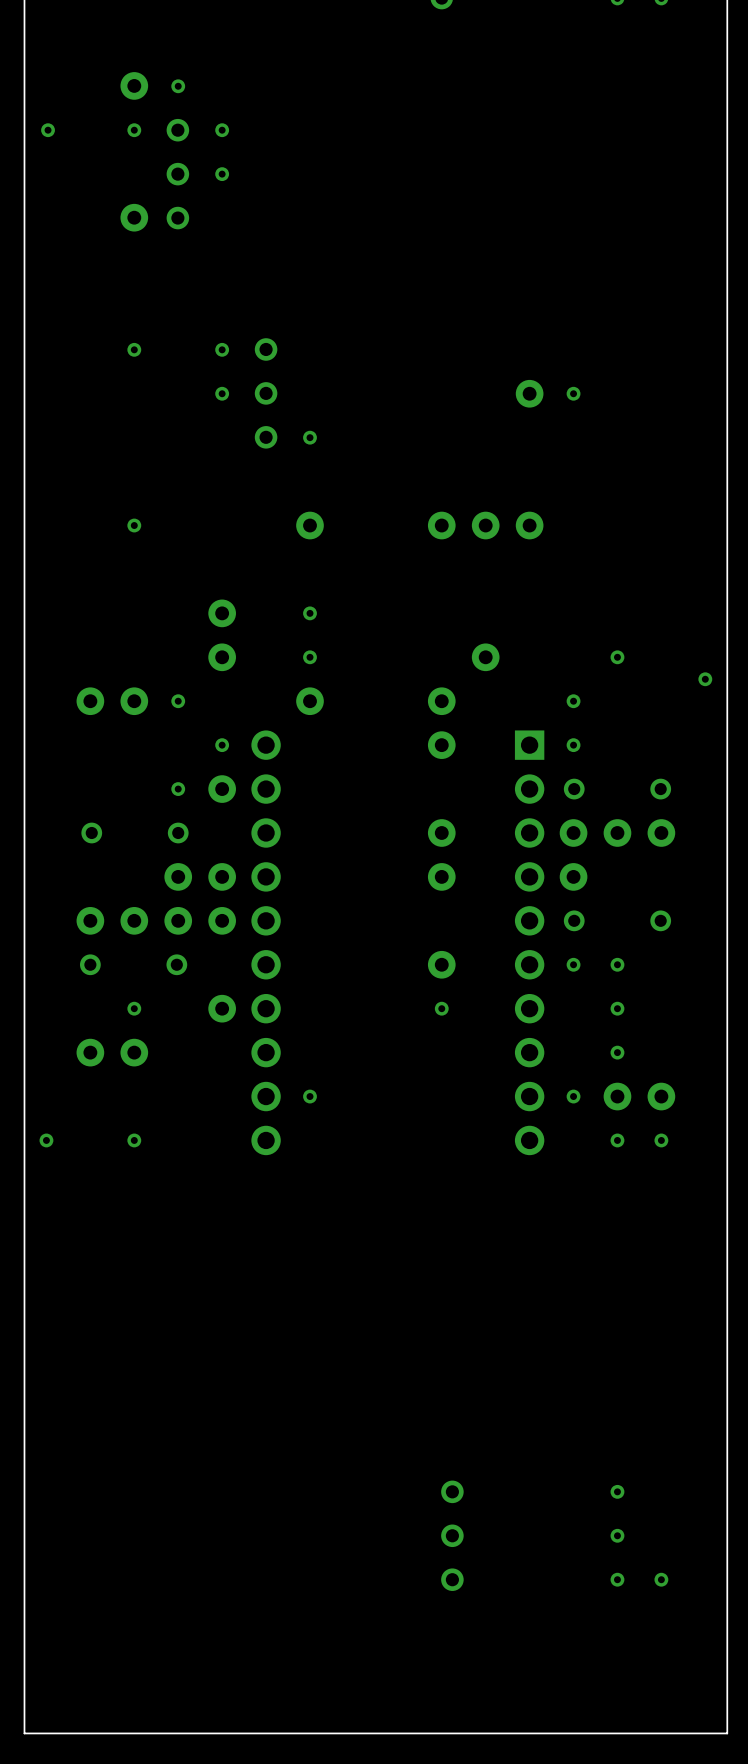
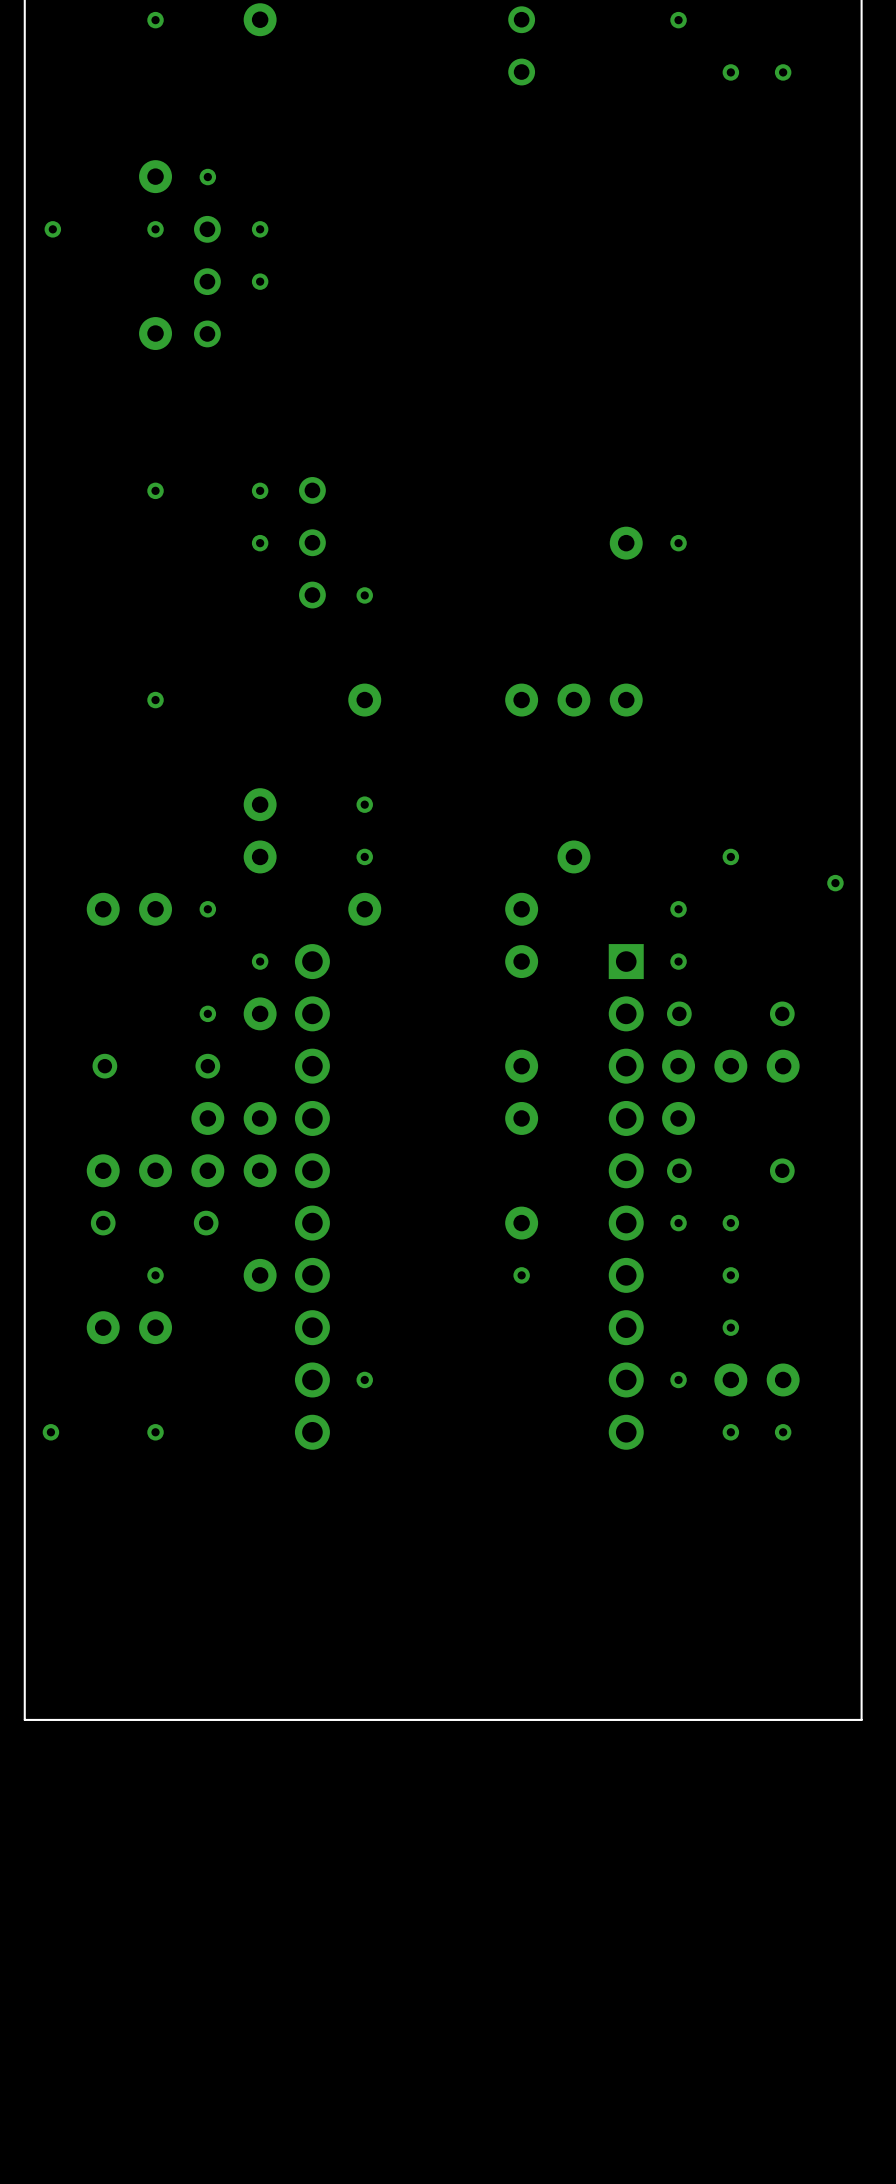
board edge: (727, 1382) (727, 1733) (24, 1733) (24, 1382) -> (861, 1719) (24, 1719)
via: (617, 1491) -> none
part: (452, 1535) -> none
via: (617, 1535) -> none
via: (617, 1579) -> none
via: (661, 1579) -> none

